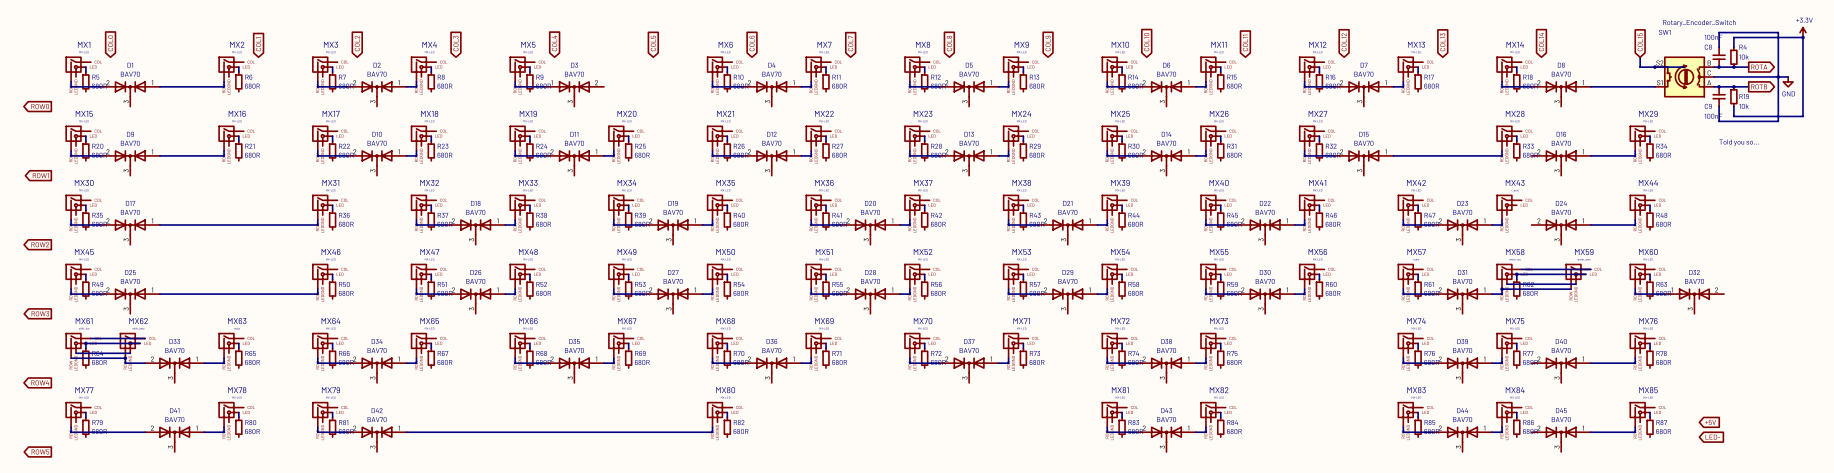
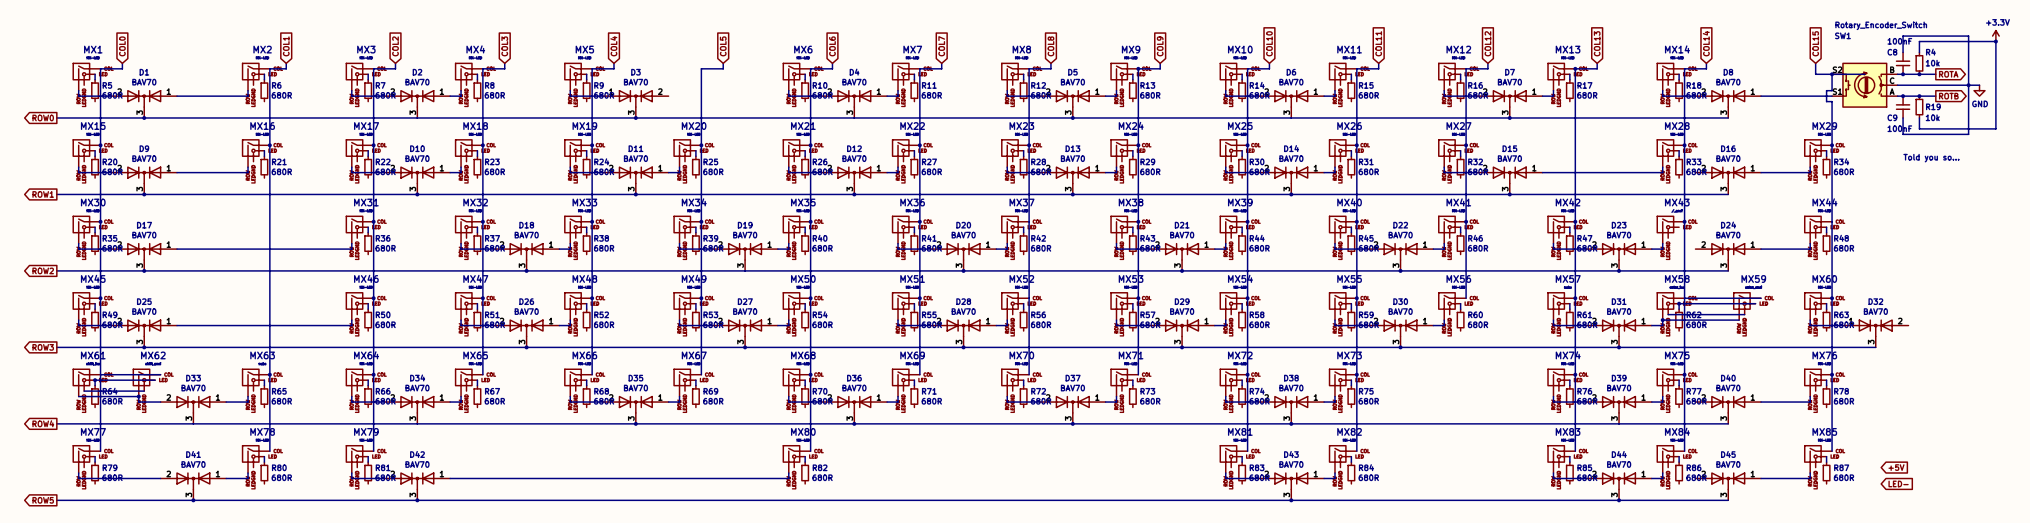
wire: none -> (122, 63) (122, 68) (100, 68) (100, 451)
wire: none -> (286, 63) (286, 68) (269, 68) (269, 451)
wire: none -> (395, 63) (395, 68) (373, 68) (373, 451)
wire: none -> (504, 63) (504, 68) (482, 68) (482, 374)
wire: none -> (613, 63) (613, 68) (592, 68) (592, 374)
wire: none -> (723, 63) (723, 68) (701, 68) (701, 374)
wire: none -> (832, 63) (832, 68) (810, 68) (810, 451)
wire: none -> (941, 63) (941, 68) (919, 68) (919, 374)
wire: none -> (1050, 63) (1050, 68) (1029, 68) (1029, 374)
wire: none -> (1160, 63) (1160, 68) (1138, 68) (1138, 374)
wire: none -> (1269, 63) (1269, 68) (1247, 68) (1247, 451)
wire: none -> (1378, 63) (1378, 68) (1356, 68) (1356, 451)
wire: none -> (1487, 63) (1487, 68) (1466, 68) (1466, 298)
wire: none -> (1597, 63) (1597, 68) (1575, 68) (1575, 451)
wire: none -> (1706, 63) (1706, 68) (1684, 68) (1684, 451)
junction: none -> (1138, 68)
junction: none -> (1575, 68)
wire: none -> (1832, 74) (1832, 90) (1826, 90) (1826, 101) (1832, 101) (1832, 451)
wire: none -> (56, 117) (1728, 117)
junction: none -> (144, 117)
junction: none -> (635, 117)
junction: none -> (1072, 117)
junction: none -> (1509, 117)
junction: none -> (100, 145)
junction: none -> (269, 145)
junction: none -> (373, 145)
junction: none -> (482, 145)
junction: none -> (592, 145)
junction: none -> (701, 145)
junction: none -> (810, 145)
junction: none -> (919, 145)
junction: none -> (1029, 145)
junction: none -> (1138, 145)
junction: none -> (1247, 145)
junction: none -> (1356, 145)
junction: none -> (1466, 145)
junction: none -> (1684, 145)
junction: none -> (1832, 145)
wire: none -> (56, 194) (1728, 194)
junction: none -> (144, 194)
junction: none -> (417, 194)
junction: none -> (635, 194)
junction: none -> (854, 194)
junction: none -> (1072, 194)
junction: none -> (1291, 194)
junction: none -> (1509, 194)
junction: none -> (100, 221)
junction: none -> (373, 221)
junction: none -> (482, 221)
junction: none -> (592, 221)
junction: none -> (701, 221)
junction: none -> (810, 221)
junction: none -> (919, 221)
junction: none -> (1138, 221)
junction: none -> (1247, 221)
junction: none -> (1356, 221)
junction: none -> (1466, 221)
junction: none -> (1575, 221)
junction: none -> (1684, 221)
wire: none -> (56, 270) (1728, 270)
junction: none -> (144, 270)
junction: none -> (526, 270)
junction: none -> (963, 270)
junction: none -> (1182, 270)
junction: none -> (1400, 270)
junction: none -> (1619, 270)
junction: none -> (100, 298)
junction: none -> (373, 298)
junction: none -> (482, 298)
junction: none -> (592, 298)
junction: none -> (701, 298)
junction: none -> (810, 298)
junction: none -> (919, 298)
junction: none -> (1138, 298)
junction: none -> (1247, 298)
junction: none -> (1356, 298)
junction: none -> (1575, 298)
junction: none -> (1832, 298)
wire: none -> (56, 347) (1875, 347)
junction: none -> (144, 347)
junction: none -> (526, 347)
junction: none -> (745, 347)
junction: none -> (963, 347)
junction: none -> (1182, 347)
junction: none -> (1400, 347)
junction: none -> (1619, 347)
junction: none -> (269, 374)
junction: none -> (373, 374)
junction: none -> (810, 374)
junction: none -> (1247, 374)
junction: none -> (1356, 374)
junction: none -> (1575, 374)
junction: none -> (1684, 374)
junction: none -> (1832, 374)
wire: none -> (56, 423) (1728, 423)
junction: none -> (635, 423)
junction: none -> (854, 423)
junction: none -> (1072, 423)
junction: none -> (1291, 423)
wire: none -> (56, 500) (1728, 500)
junction: none -> (193, 500)
junction: none -> (417, 500)
junction: none -> (1291, 500)
junction: none -> (1619, 500)

